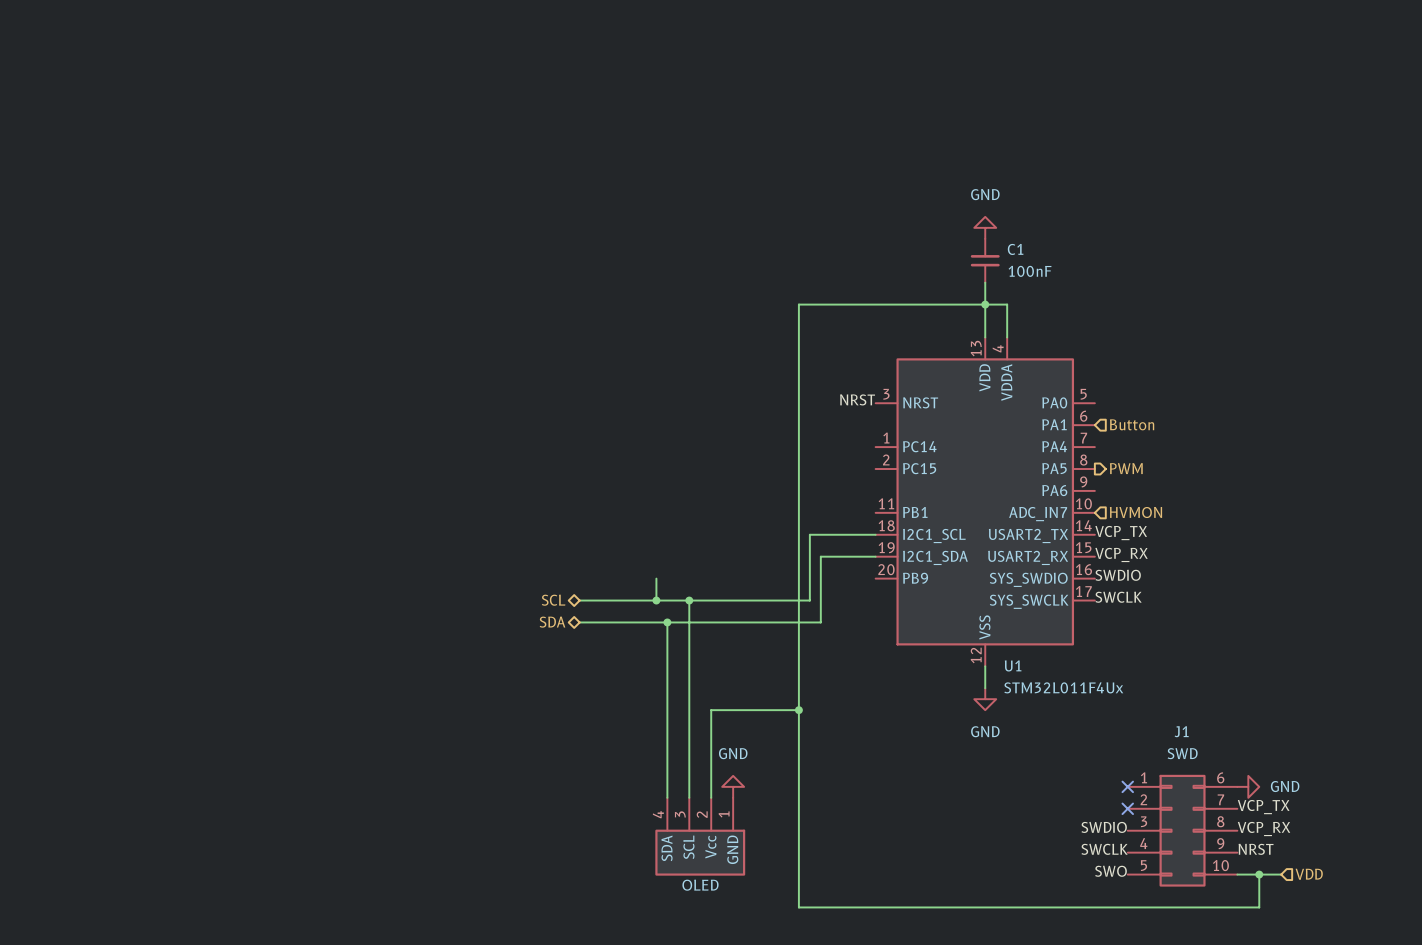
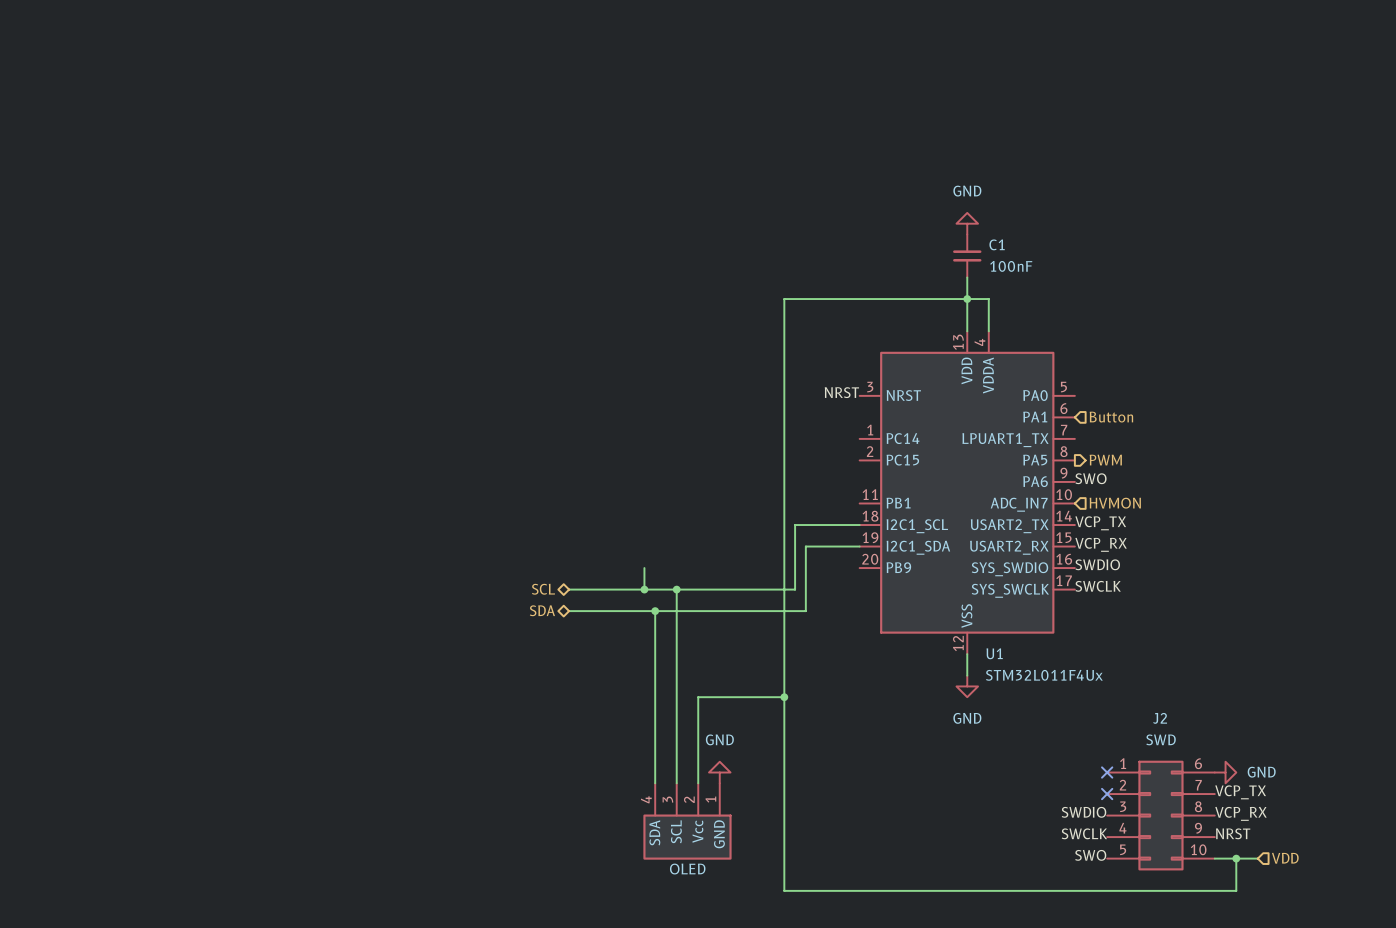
U1 pin name: PA4 (1054, 446) -> LPUART1_TX (1005, 440)
label: none -> SWO (1091, 478)
J1 name: J1 (1181, 731) -> J2 (1160, 718)

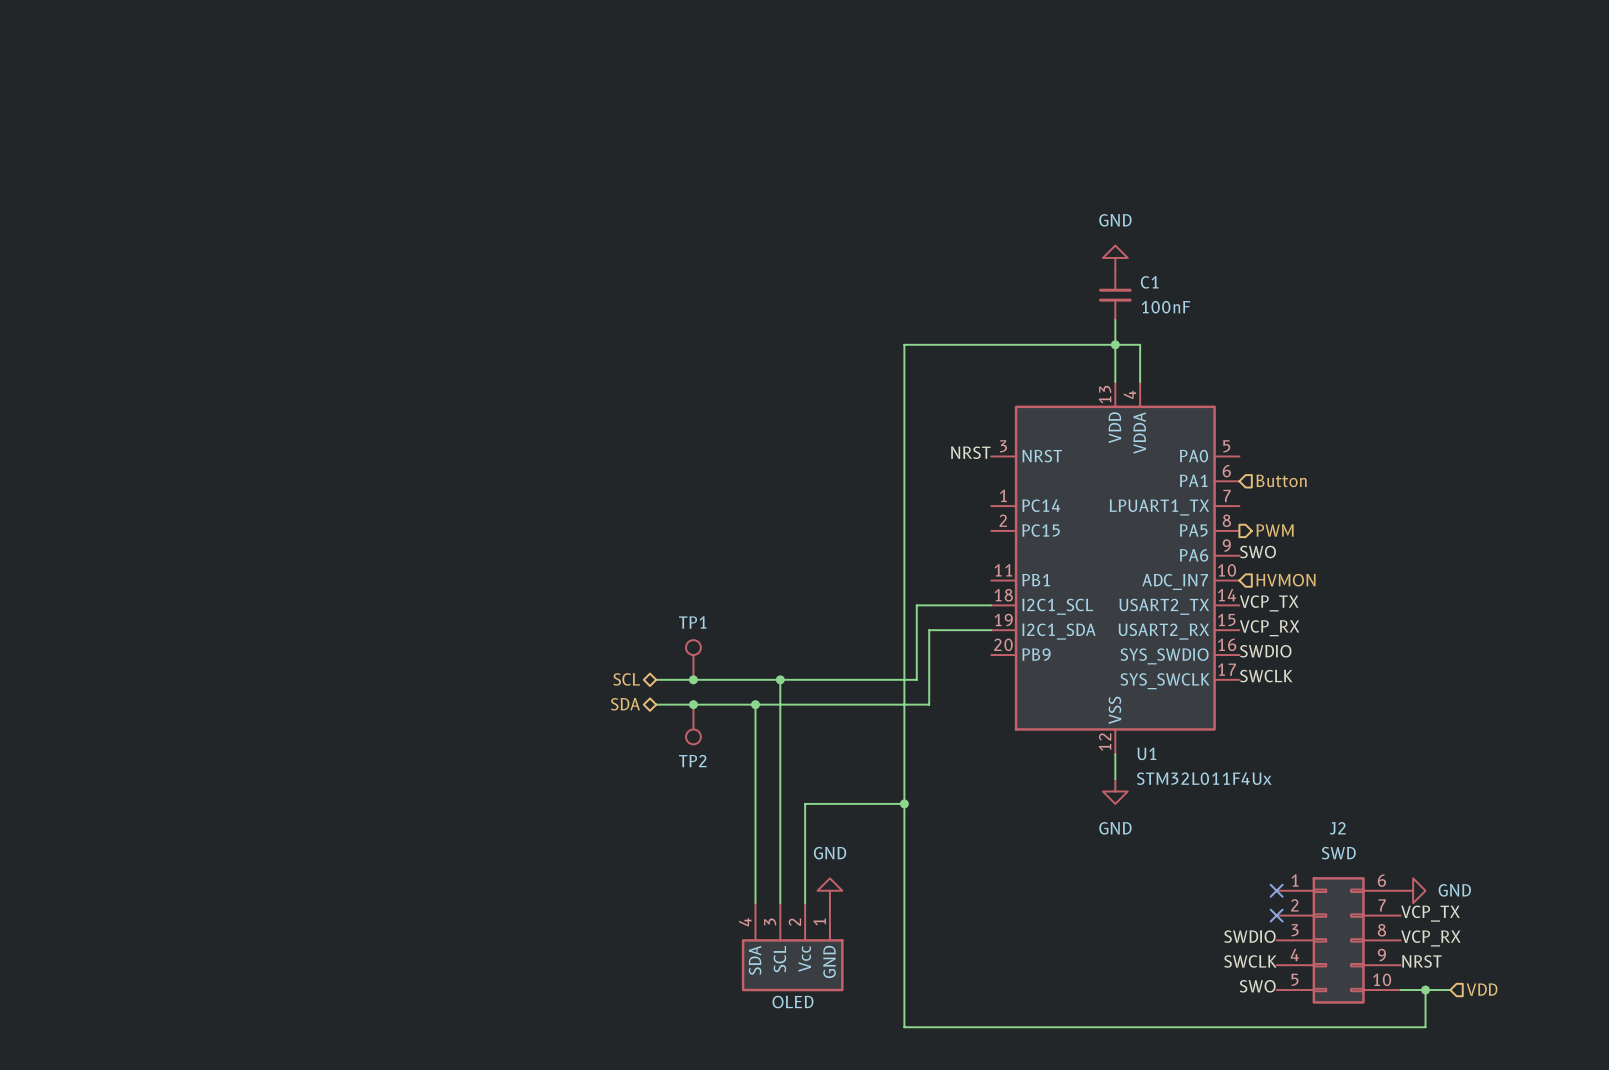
wire: (644, 568) (644, 589) -> none
TP1: none -> (693, 659)
junction: none -> (693, 679)
junction: (644, 589) -> none
junction: none -> (693, 704)
TP2: none -> (693, 724)

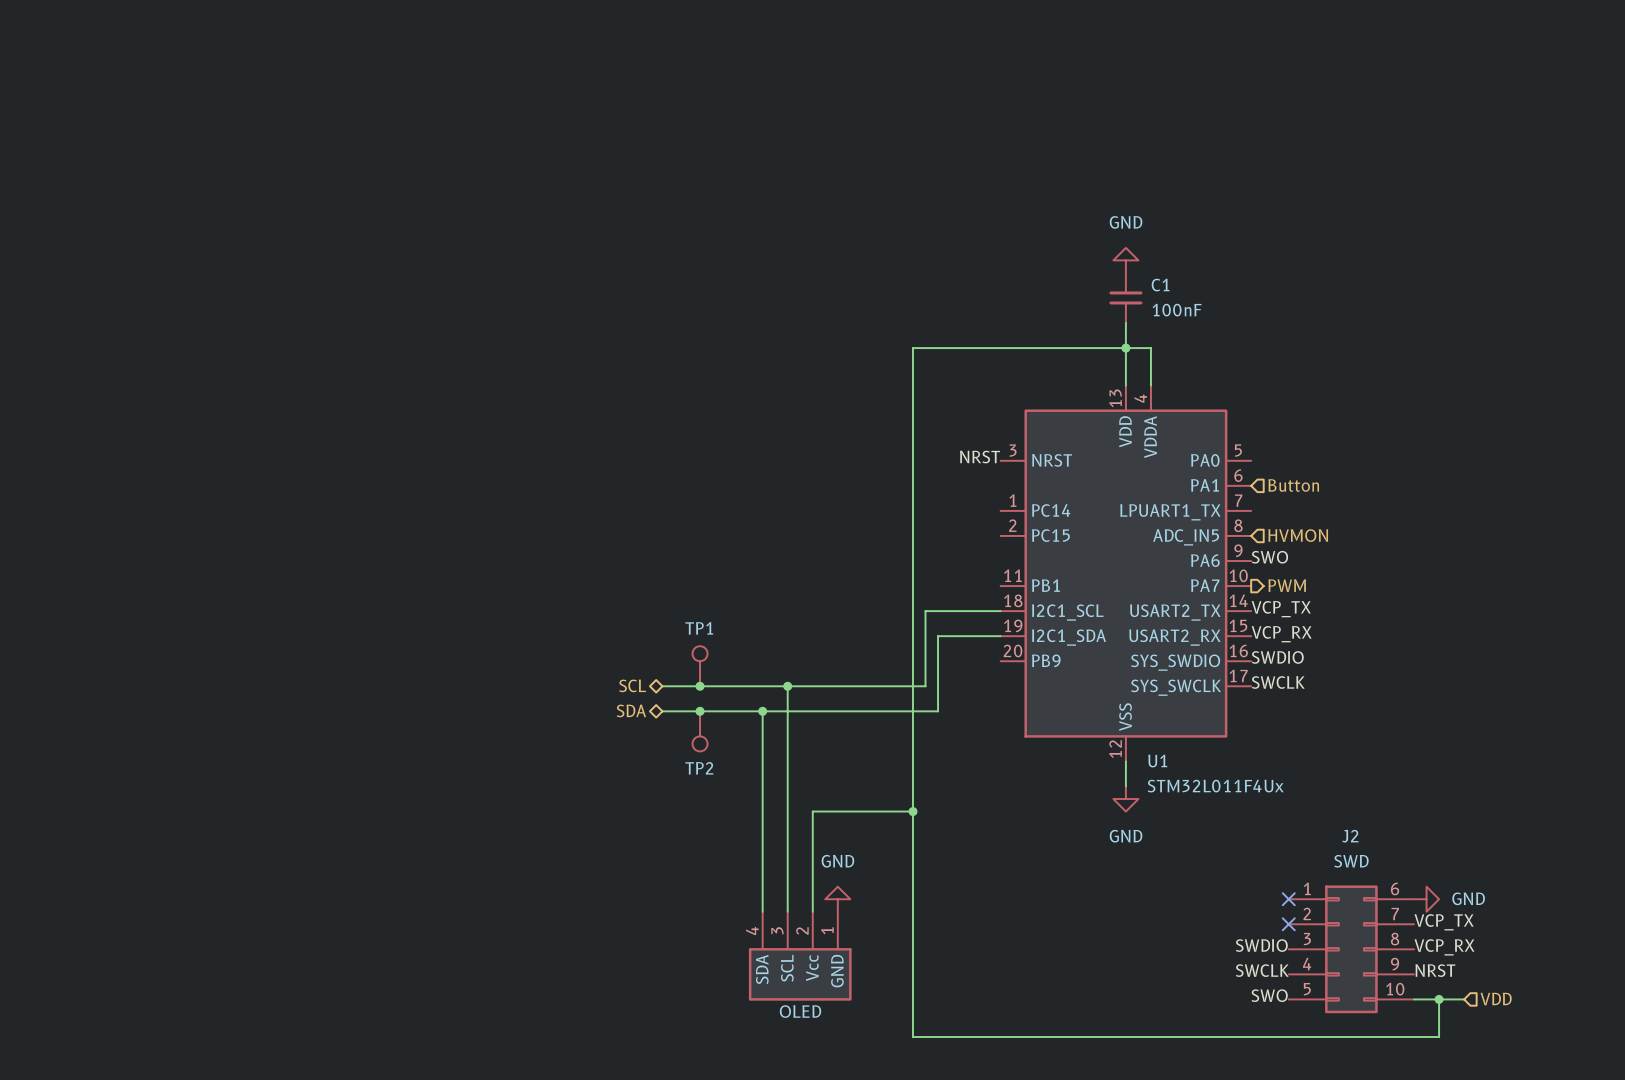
U1 pin name: PA5 (1193, 530) -> ADC_IN5 (1186, 537)
hierarchical label shape: output (1275, 530) -> input (1298, 535)
hierarchical label: PWM (1275, 530) -> HVMON (1298, 535)
hierarchical label shape: input (1285, 580) -> output (1287, 585)
hierarchical label: HVMON (1285, 580) -> PWM (1287, 585)
U1 pin name: ADC_IN7 (1175, 581) -> PA7 (1205, 585)

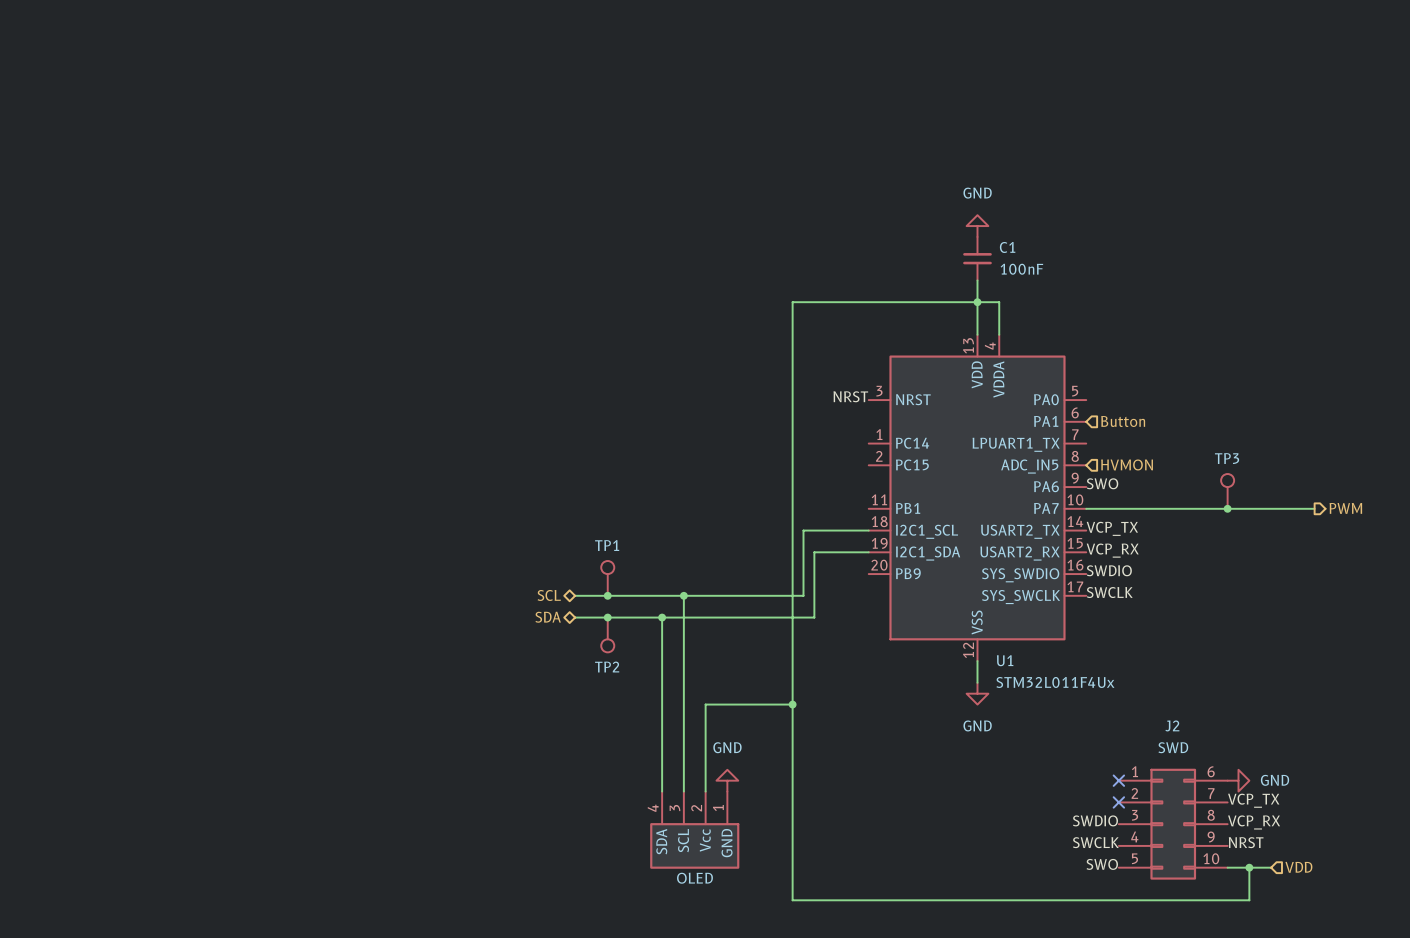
TP3: none -> (1227, 491)
hierarchical label: PWM (1287, 585) -> none
hierarchical label: none -> PWM (1345, 508)
wire: none -> (1086, 508) (1314, 508)
junction: none -> (1227, 508)

